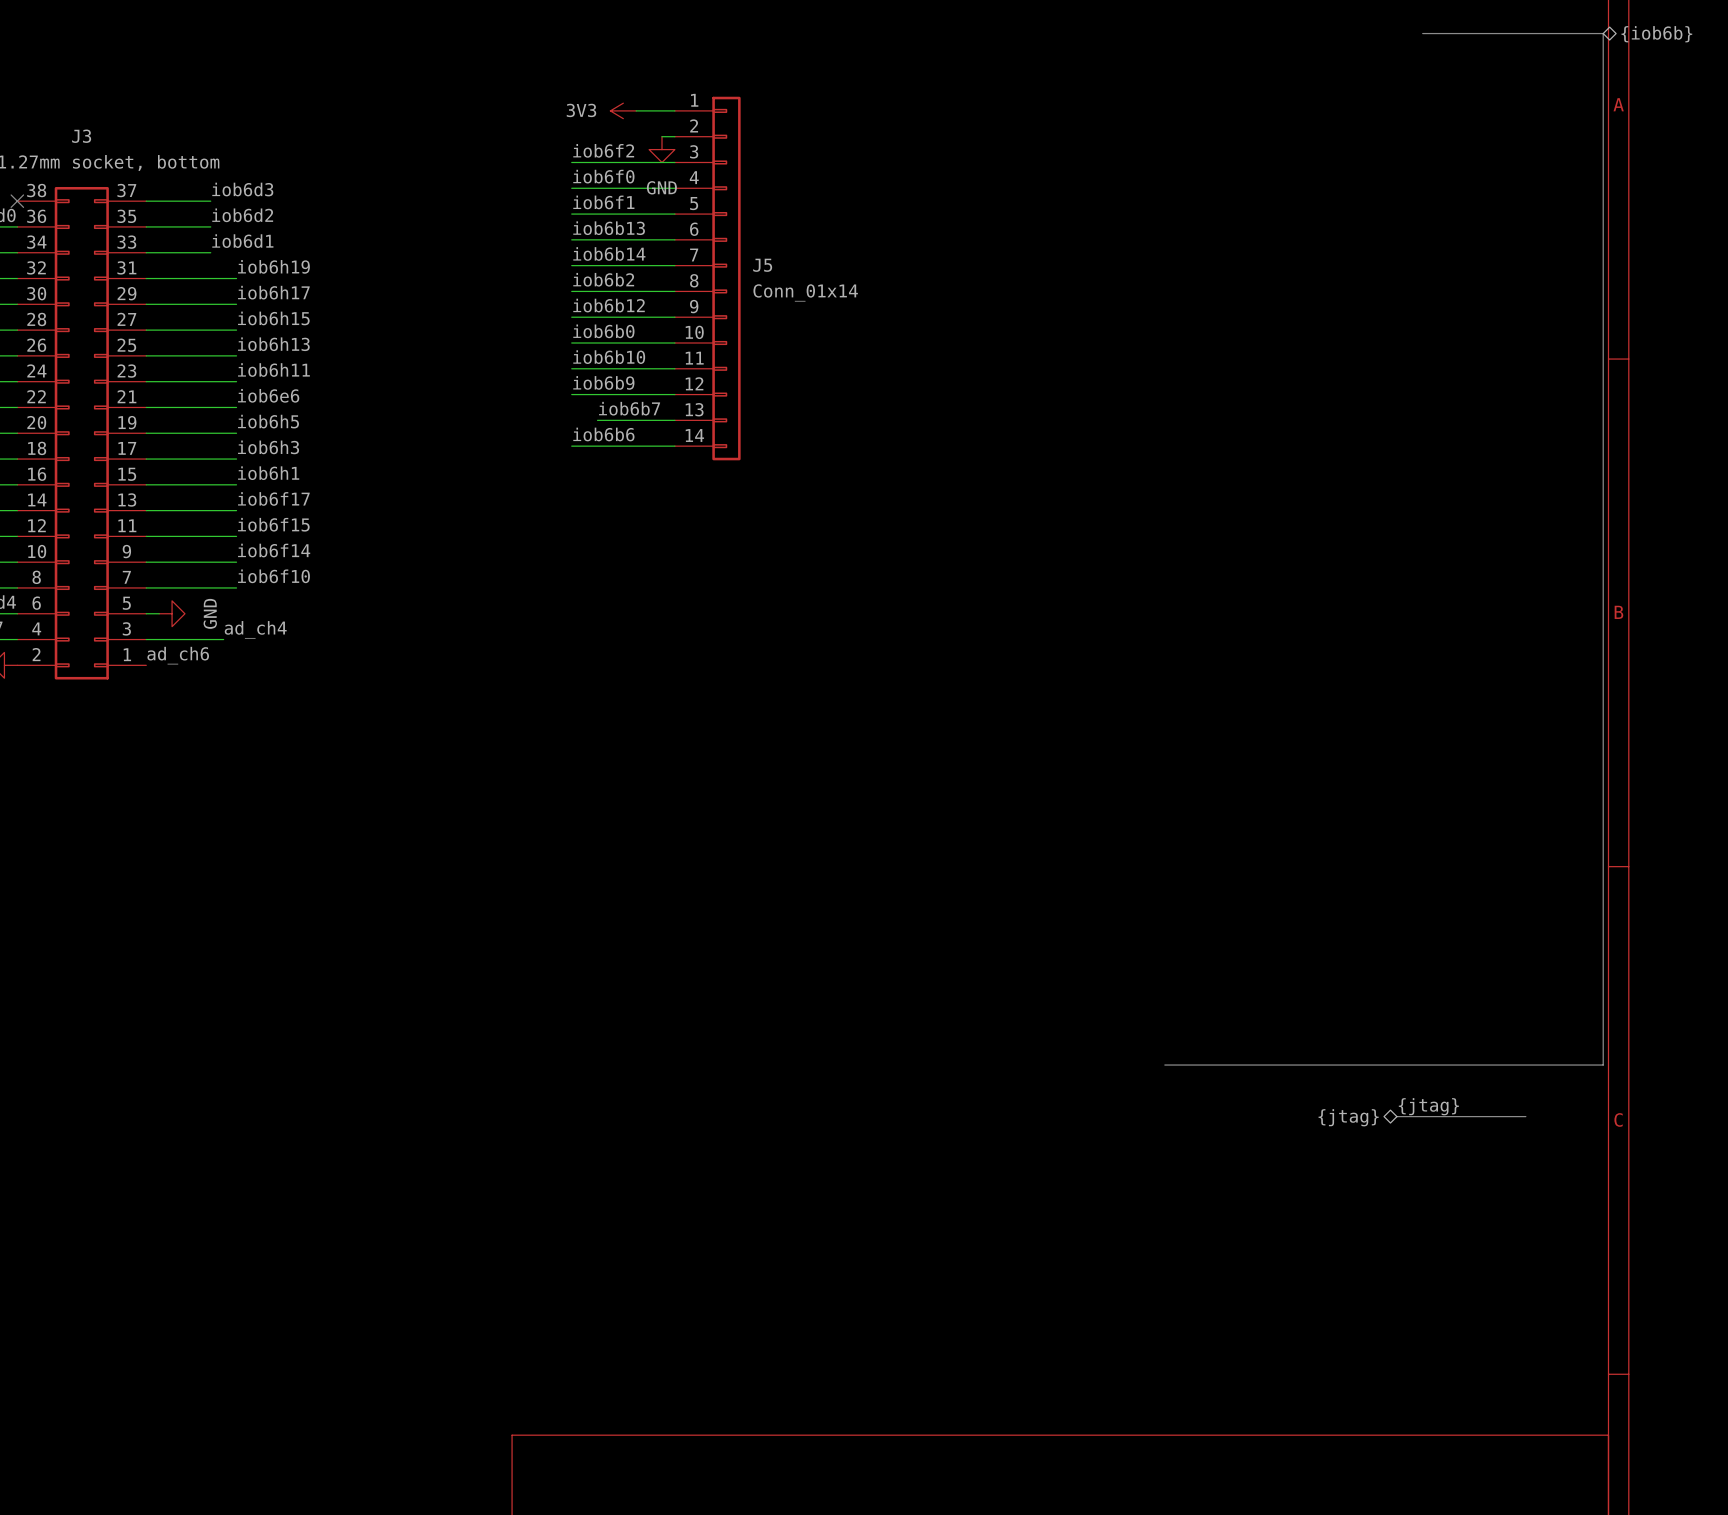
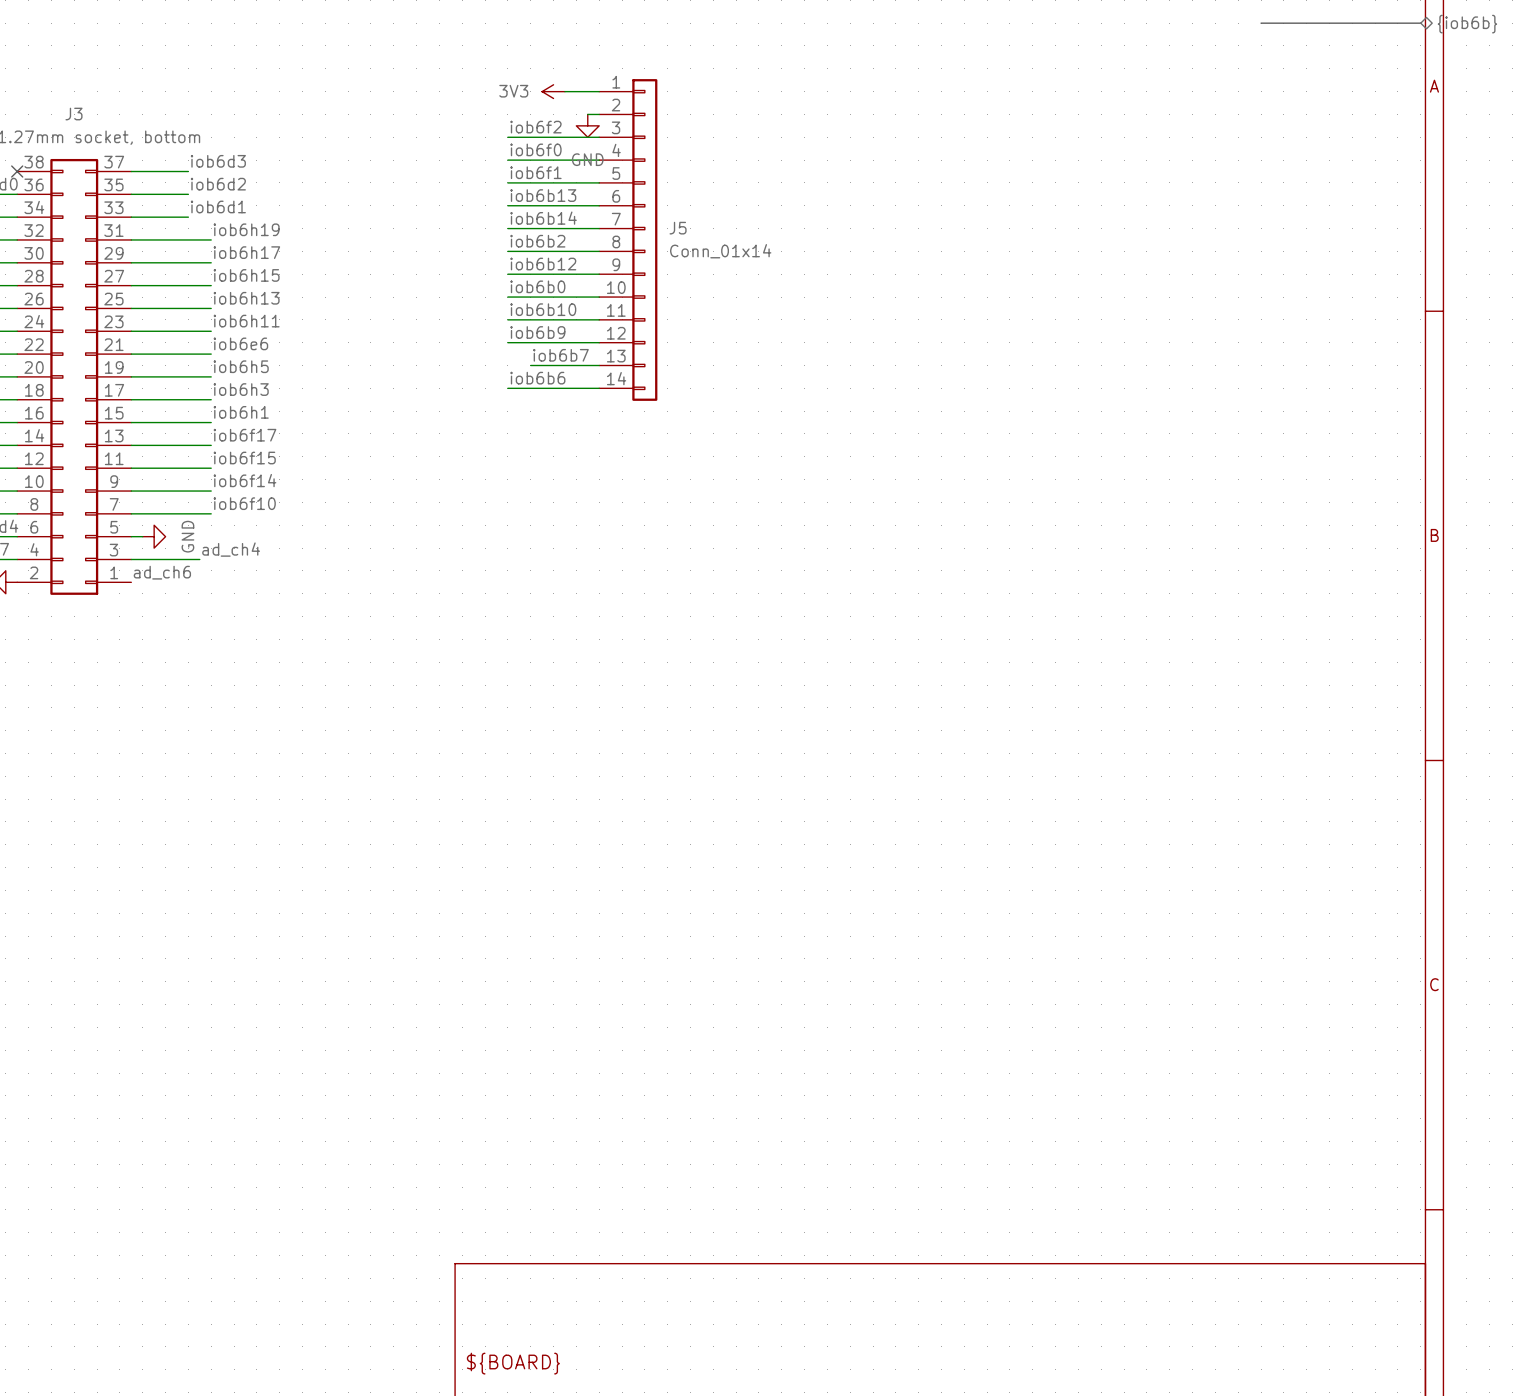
bus: (1603, 33) (1603, 1065) (1164, 1065) -> none
label: {jtag} (1428, 1106) -> none
bus: (1396, 1116) (1525, 1116) -> none
hierarchical label: {jtag} (1348, 1117) -> none

